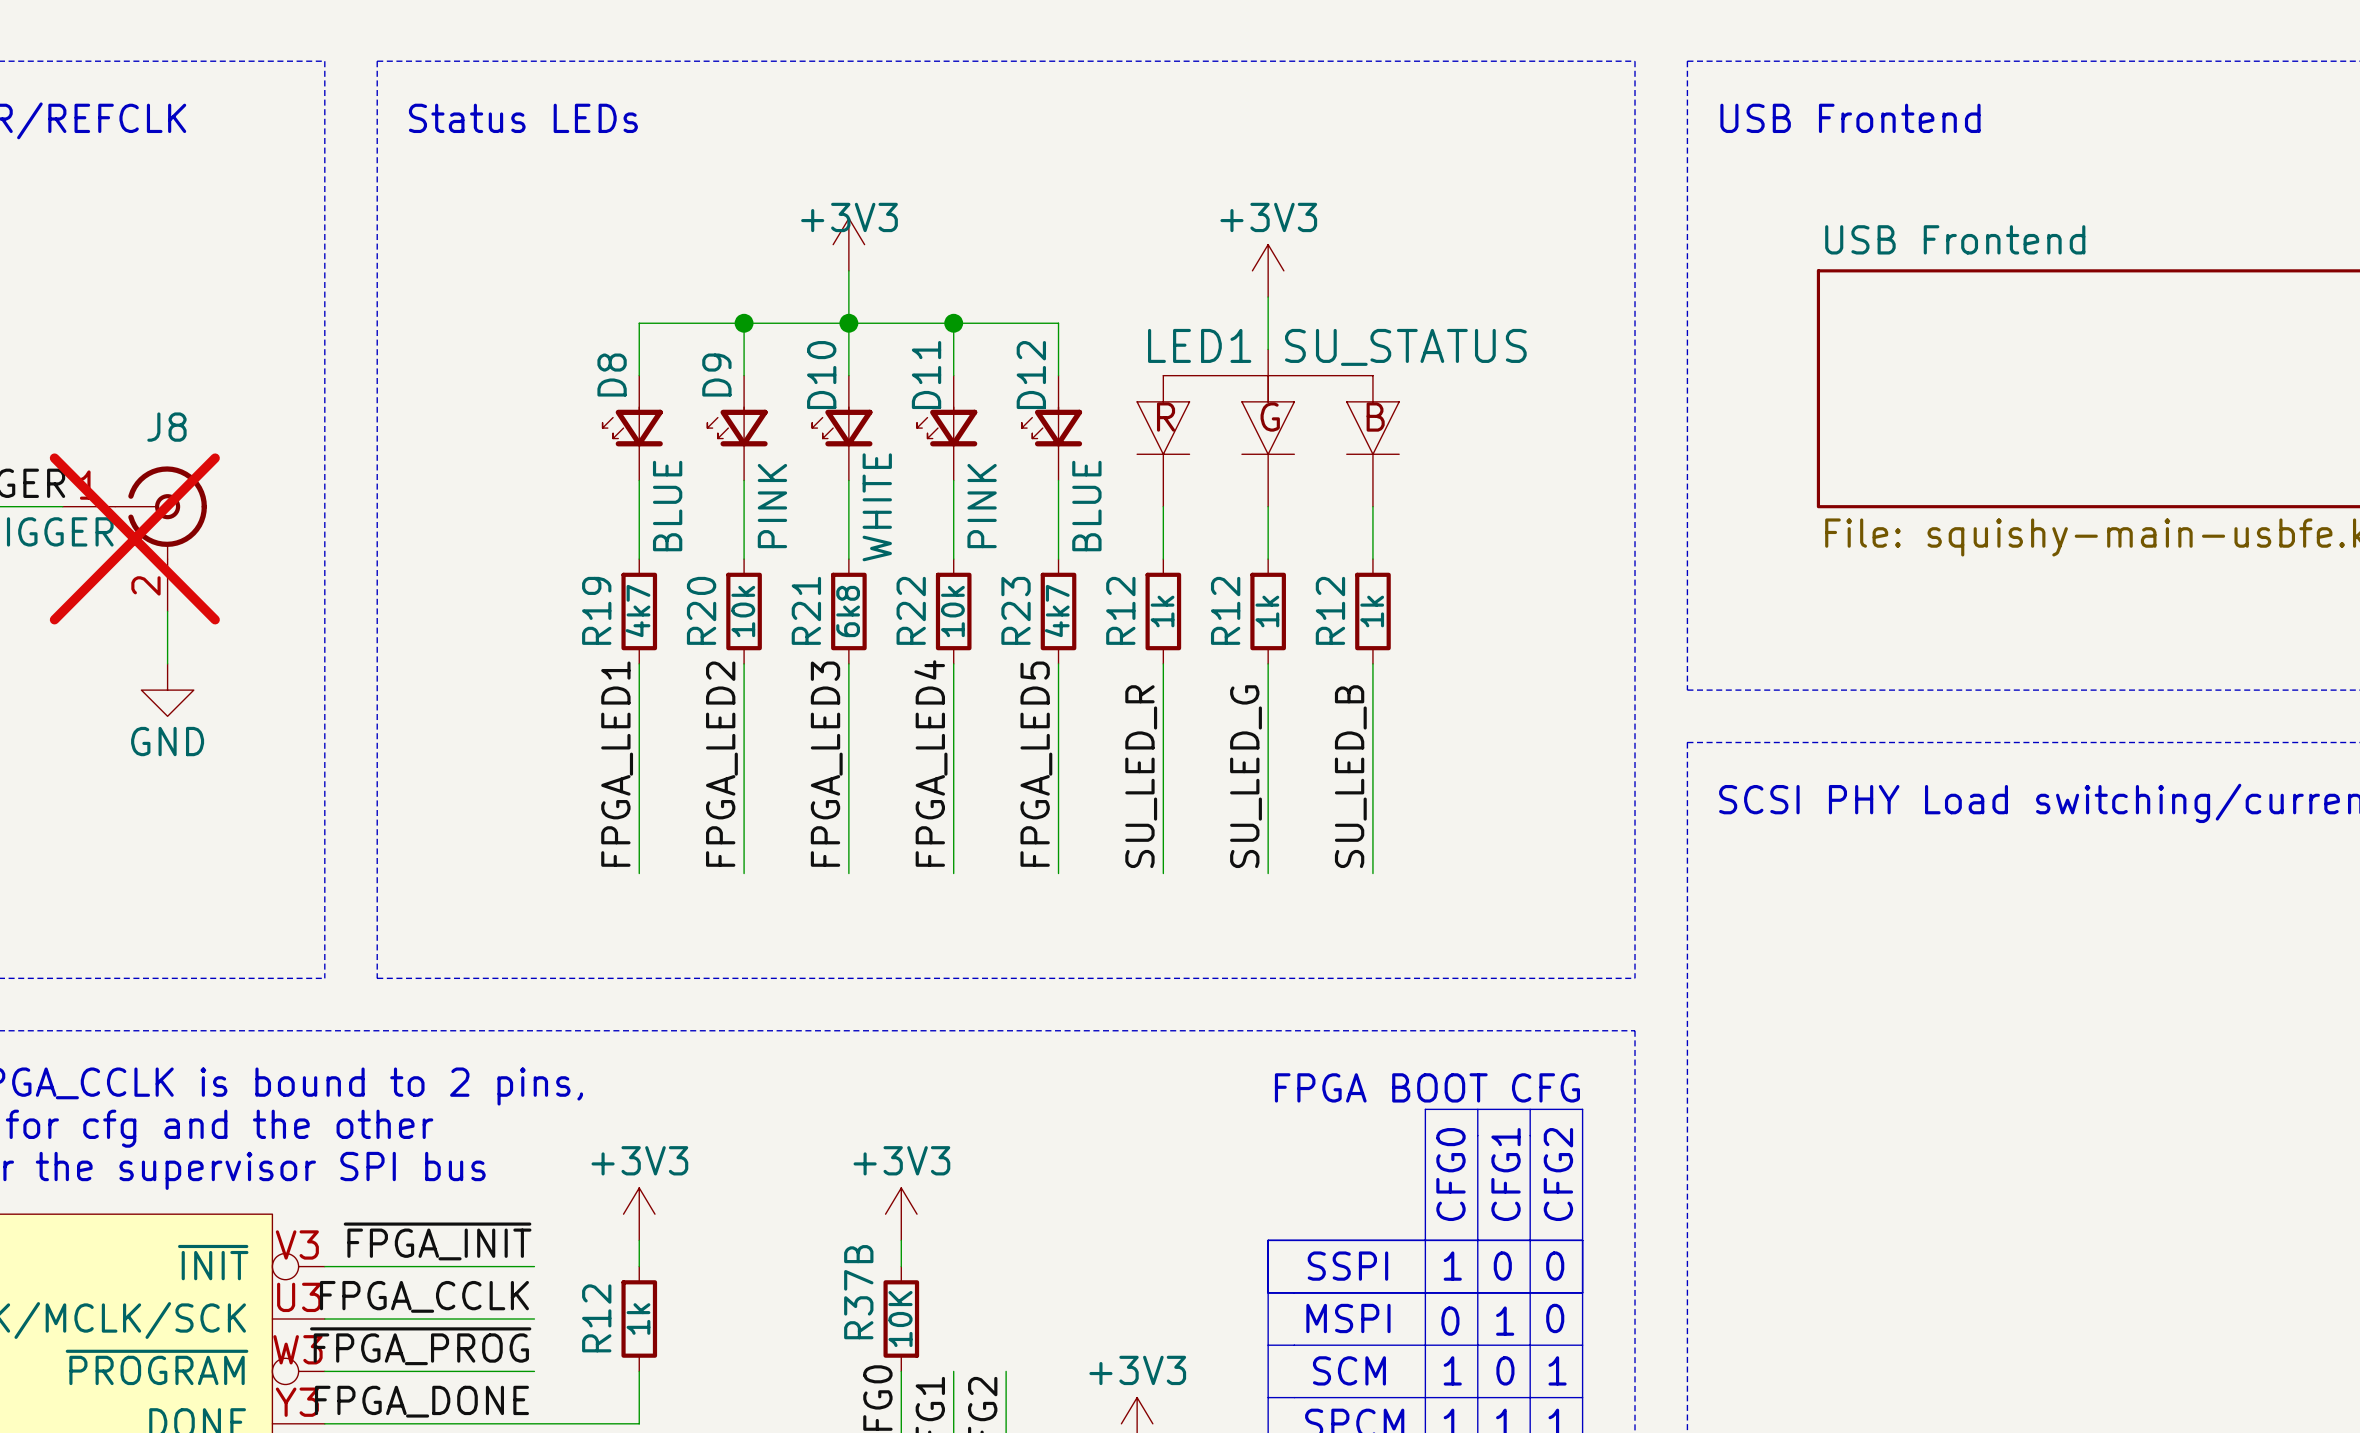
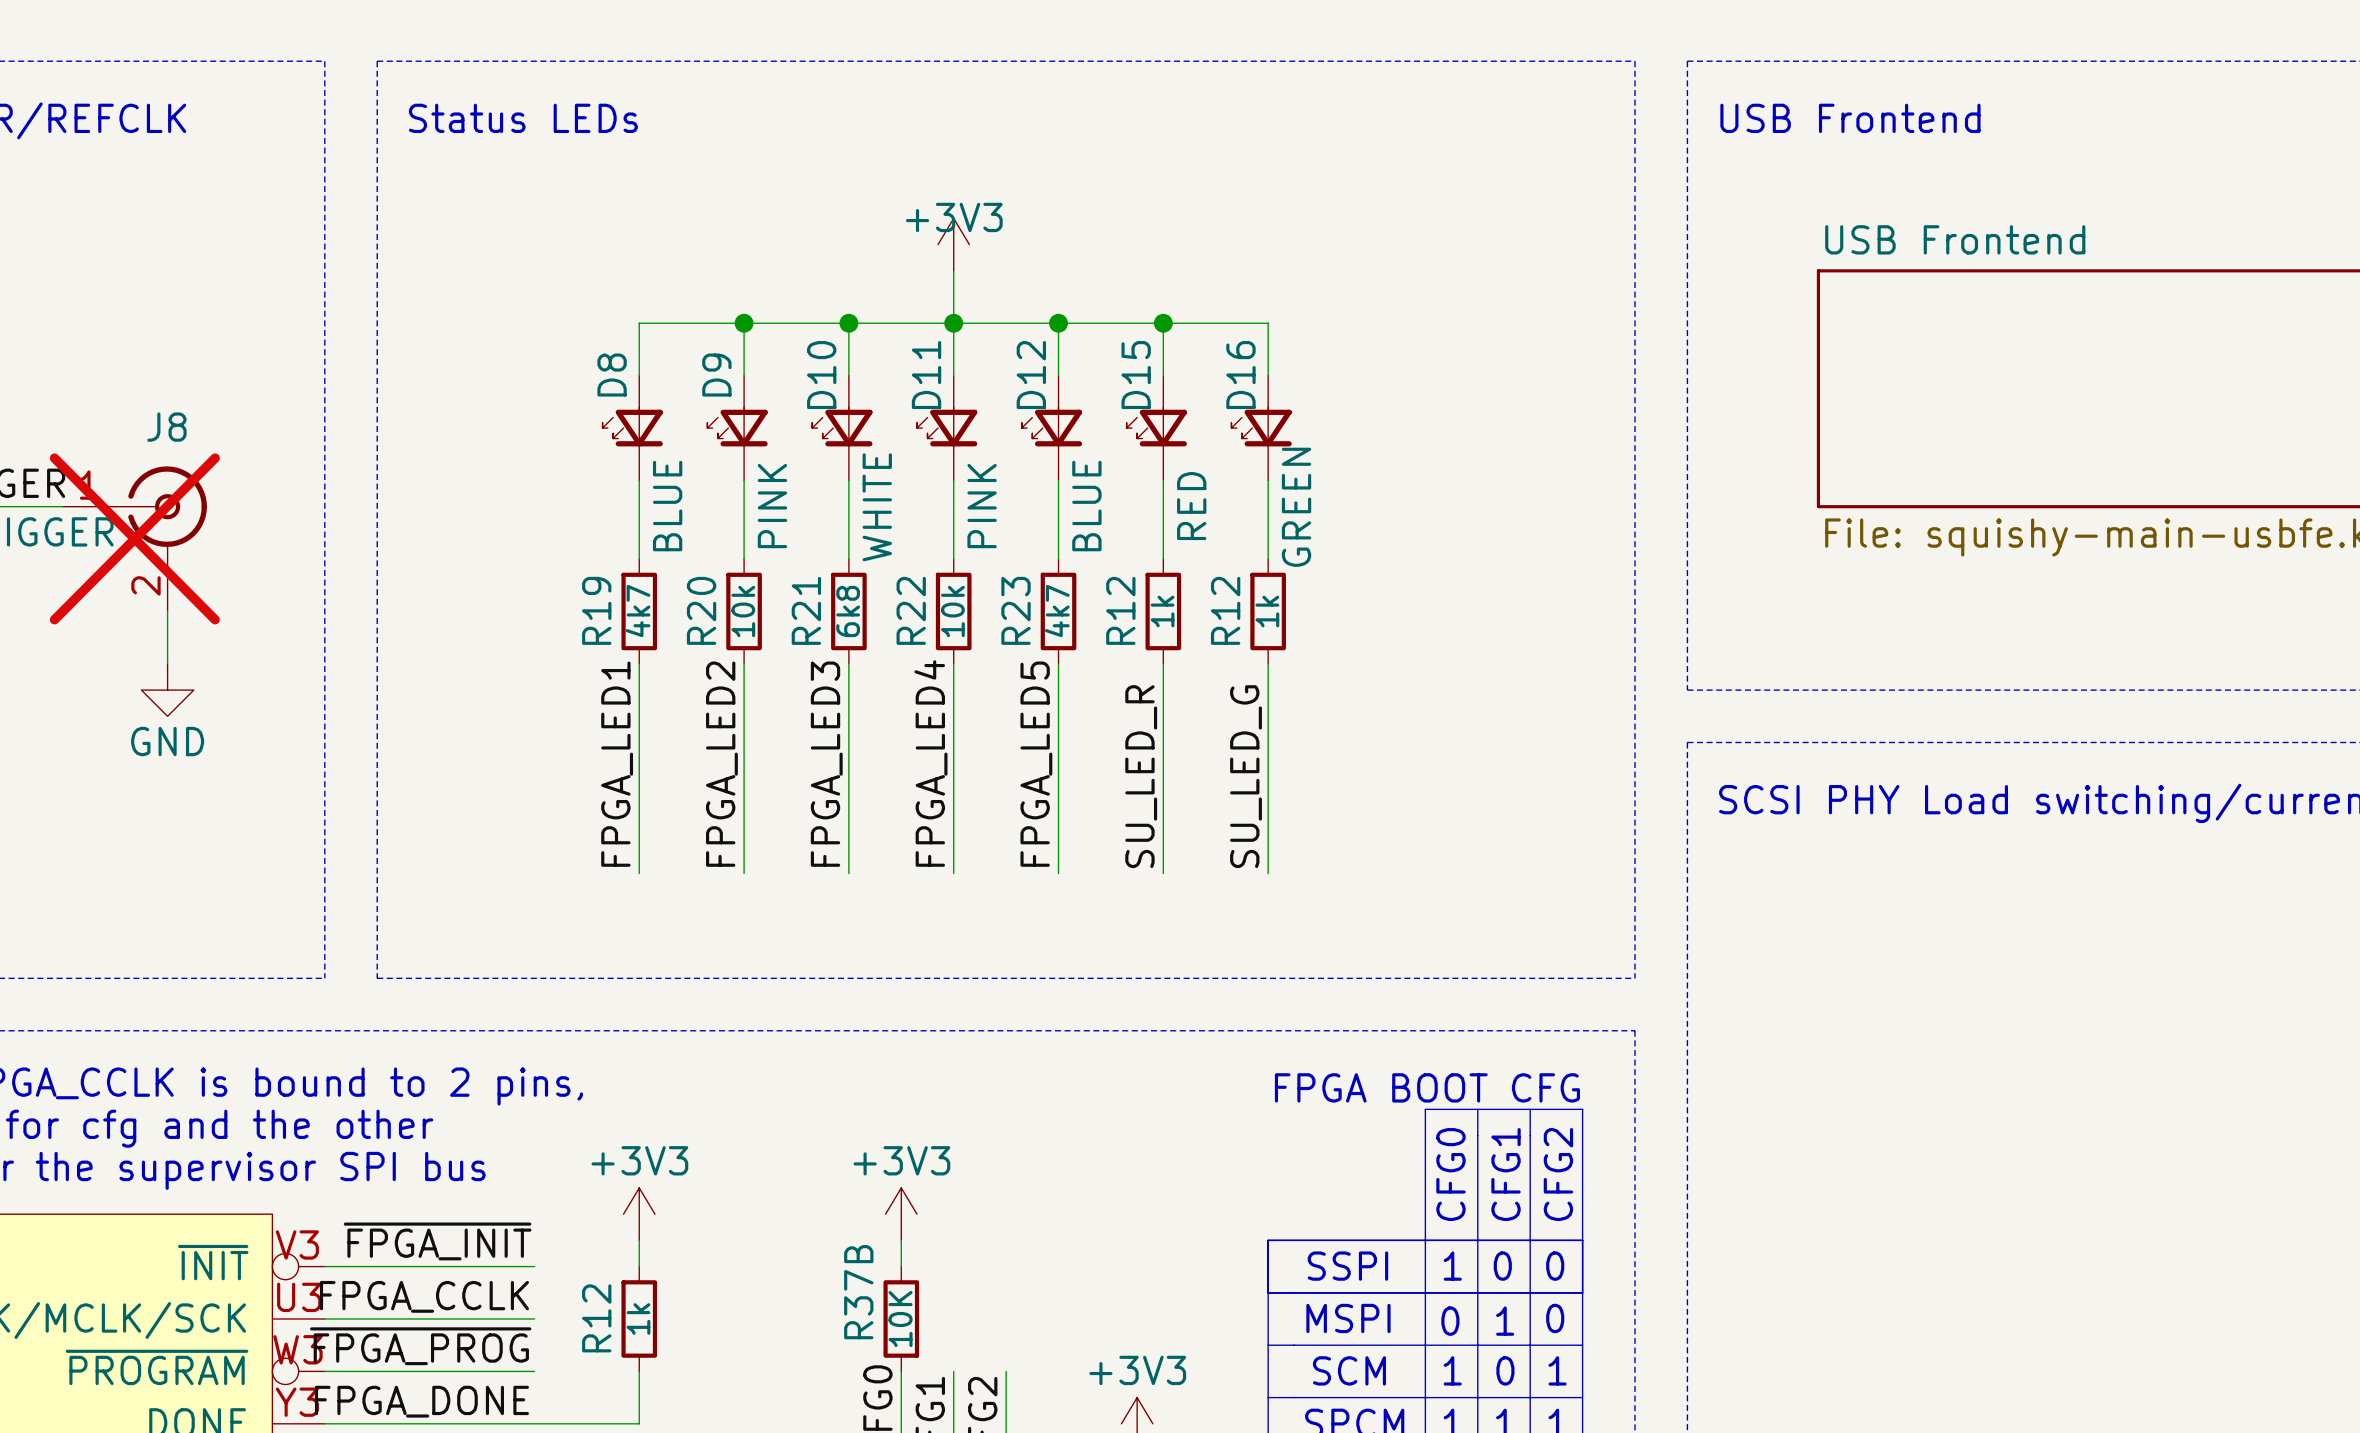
power symbol position: +3V3 (848, 244) -> +3V3 (953, 244)
wire: (848, 270) (848, 323) -> (953, 270) (953, 323)
power symbol: +3V3 (1268, 270) -> none
wire: (1268, 297) (1268, 323) -> (1058, 323) (1268, 323)
junction: none -> (1058, 323)
junction: none -> (1163, 323)
D15: none -> RED (1156, 428)
D16: none -> GREEN (1261, 428)
LED1: SU_STATUS (1268, 428) -> none
wire: (1372, 506) (1372, 559) -> (1163, 323) (1163, 375)
R12: 1k (1372, 611) -> none
wire: (1372, 663) (1372, 873) -> none
label: SU_LED_B (1350, 776) -> none

